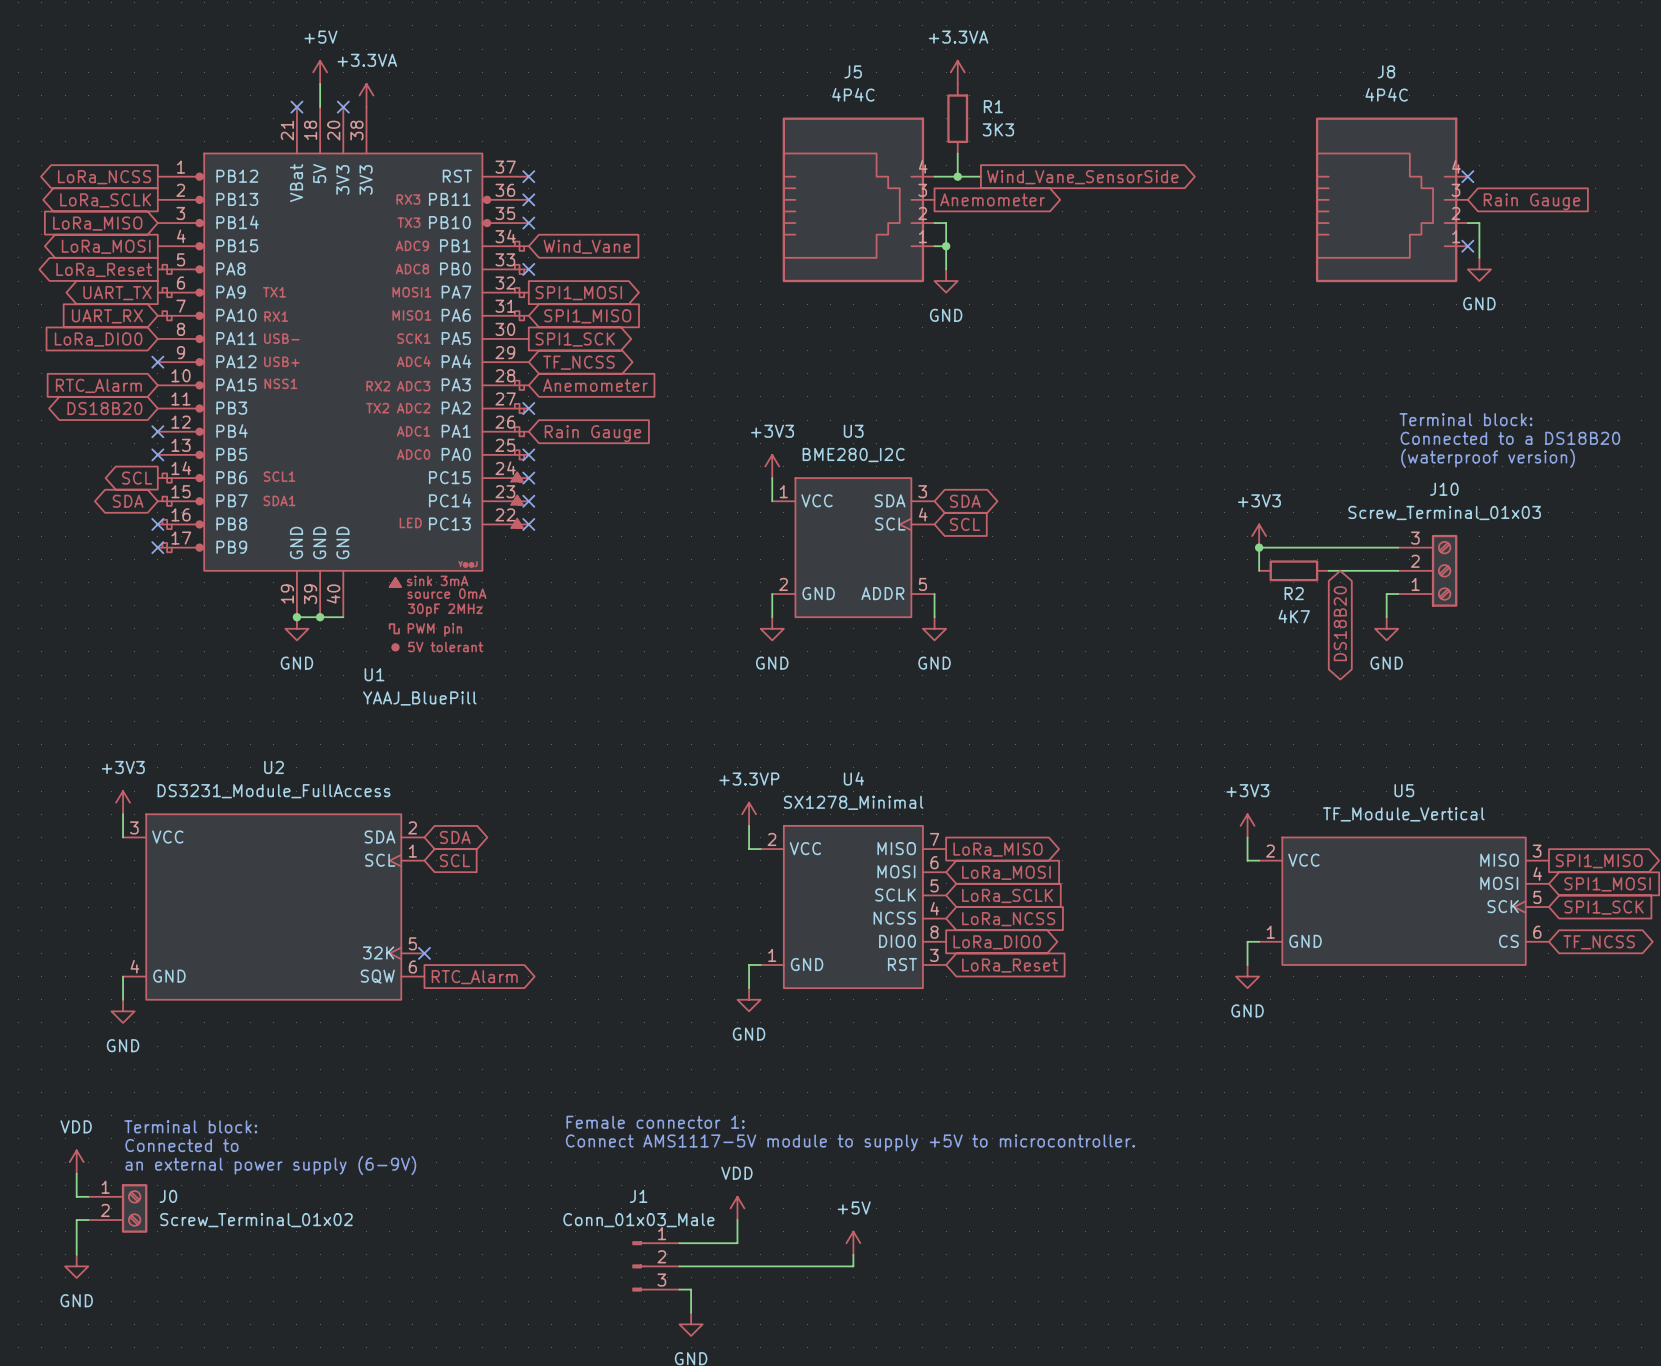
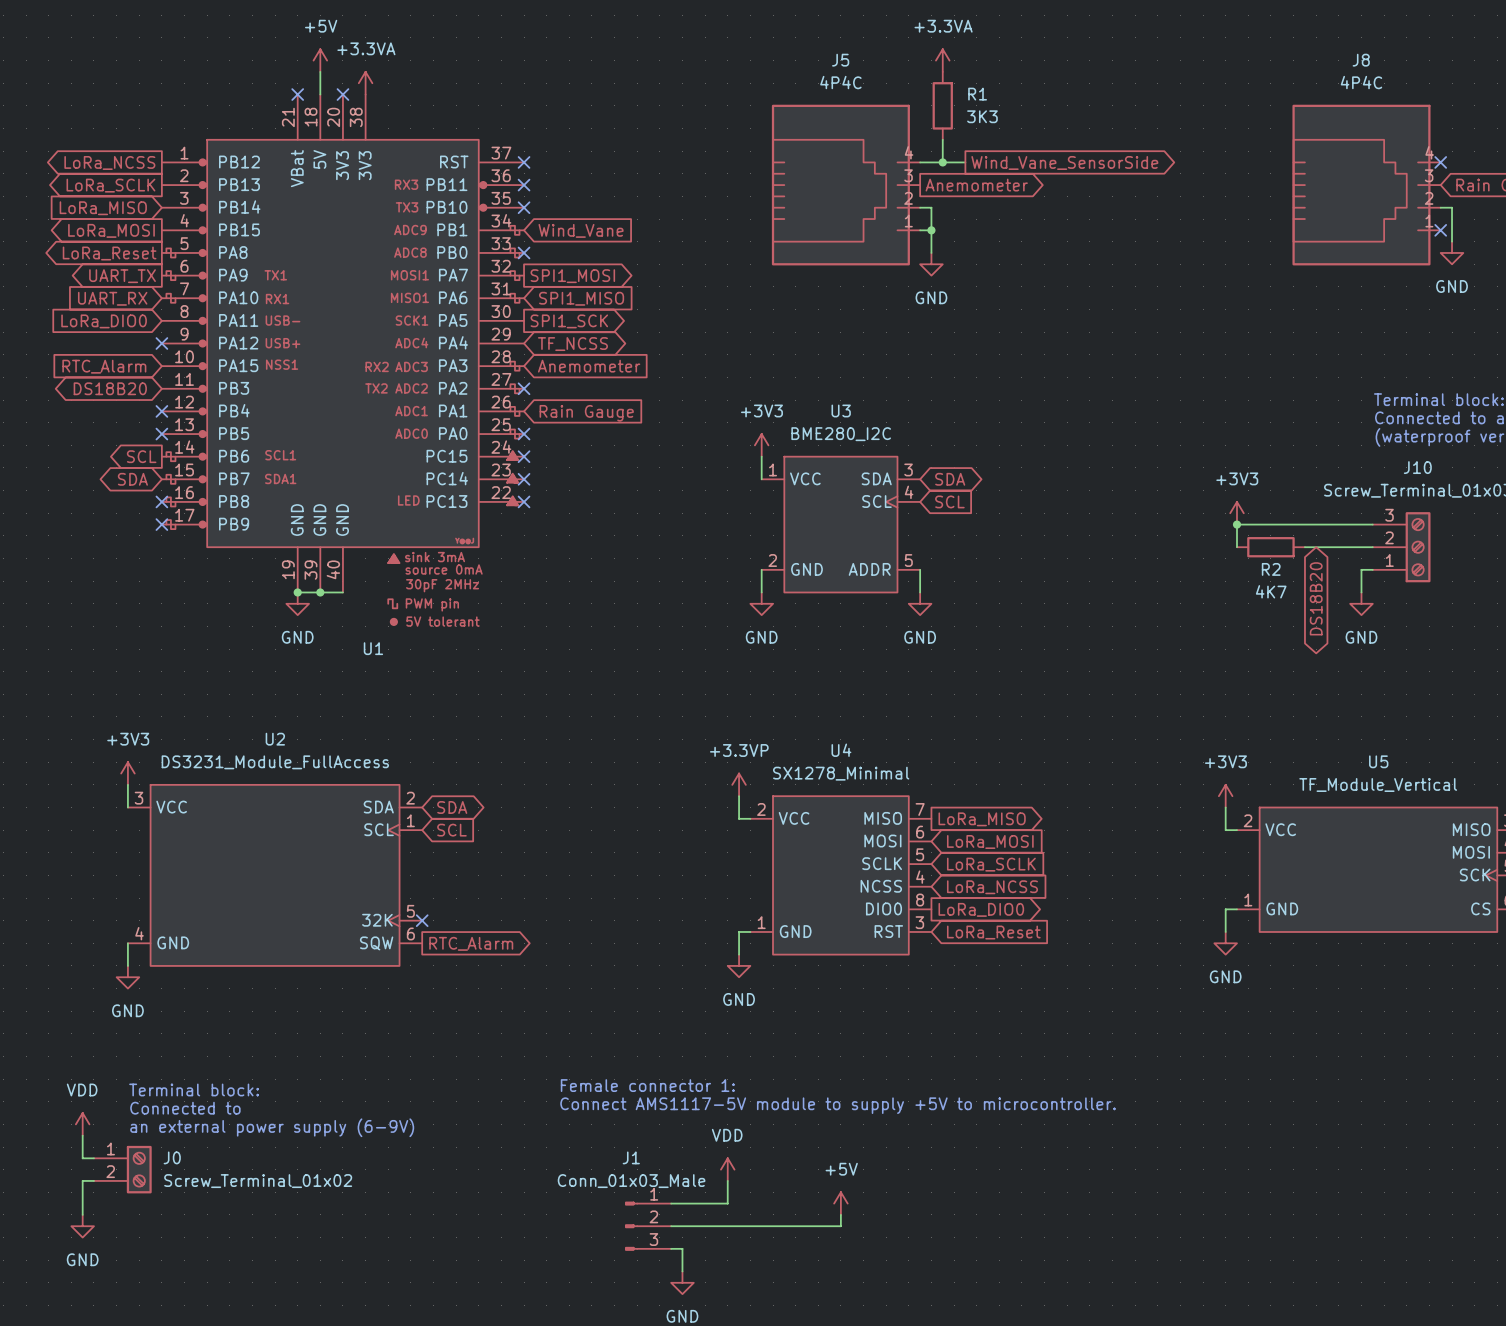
U1 value: YAAJ_BluePill (419, 698) -> none

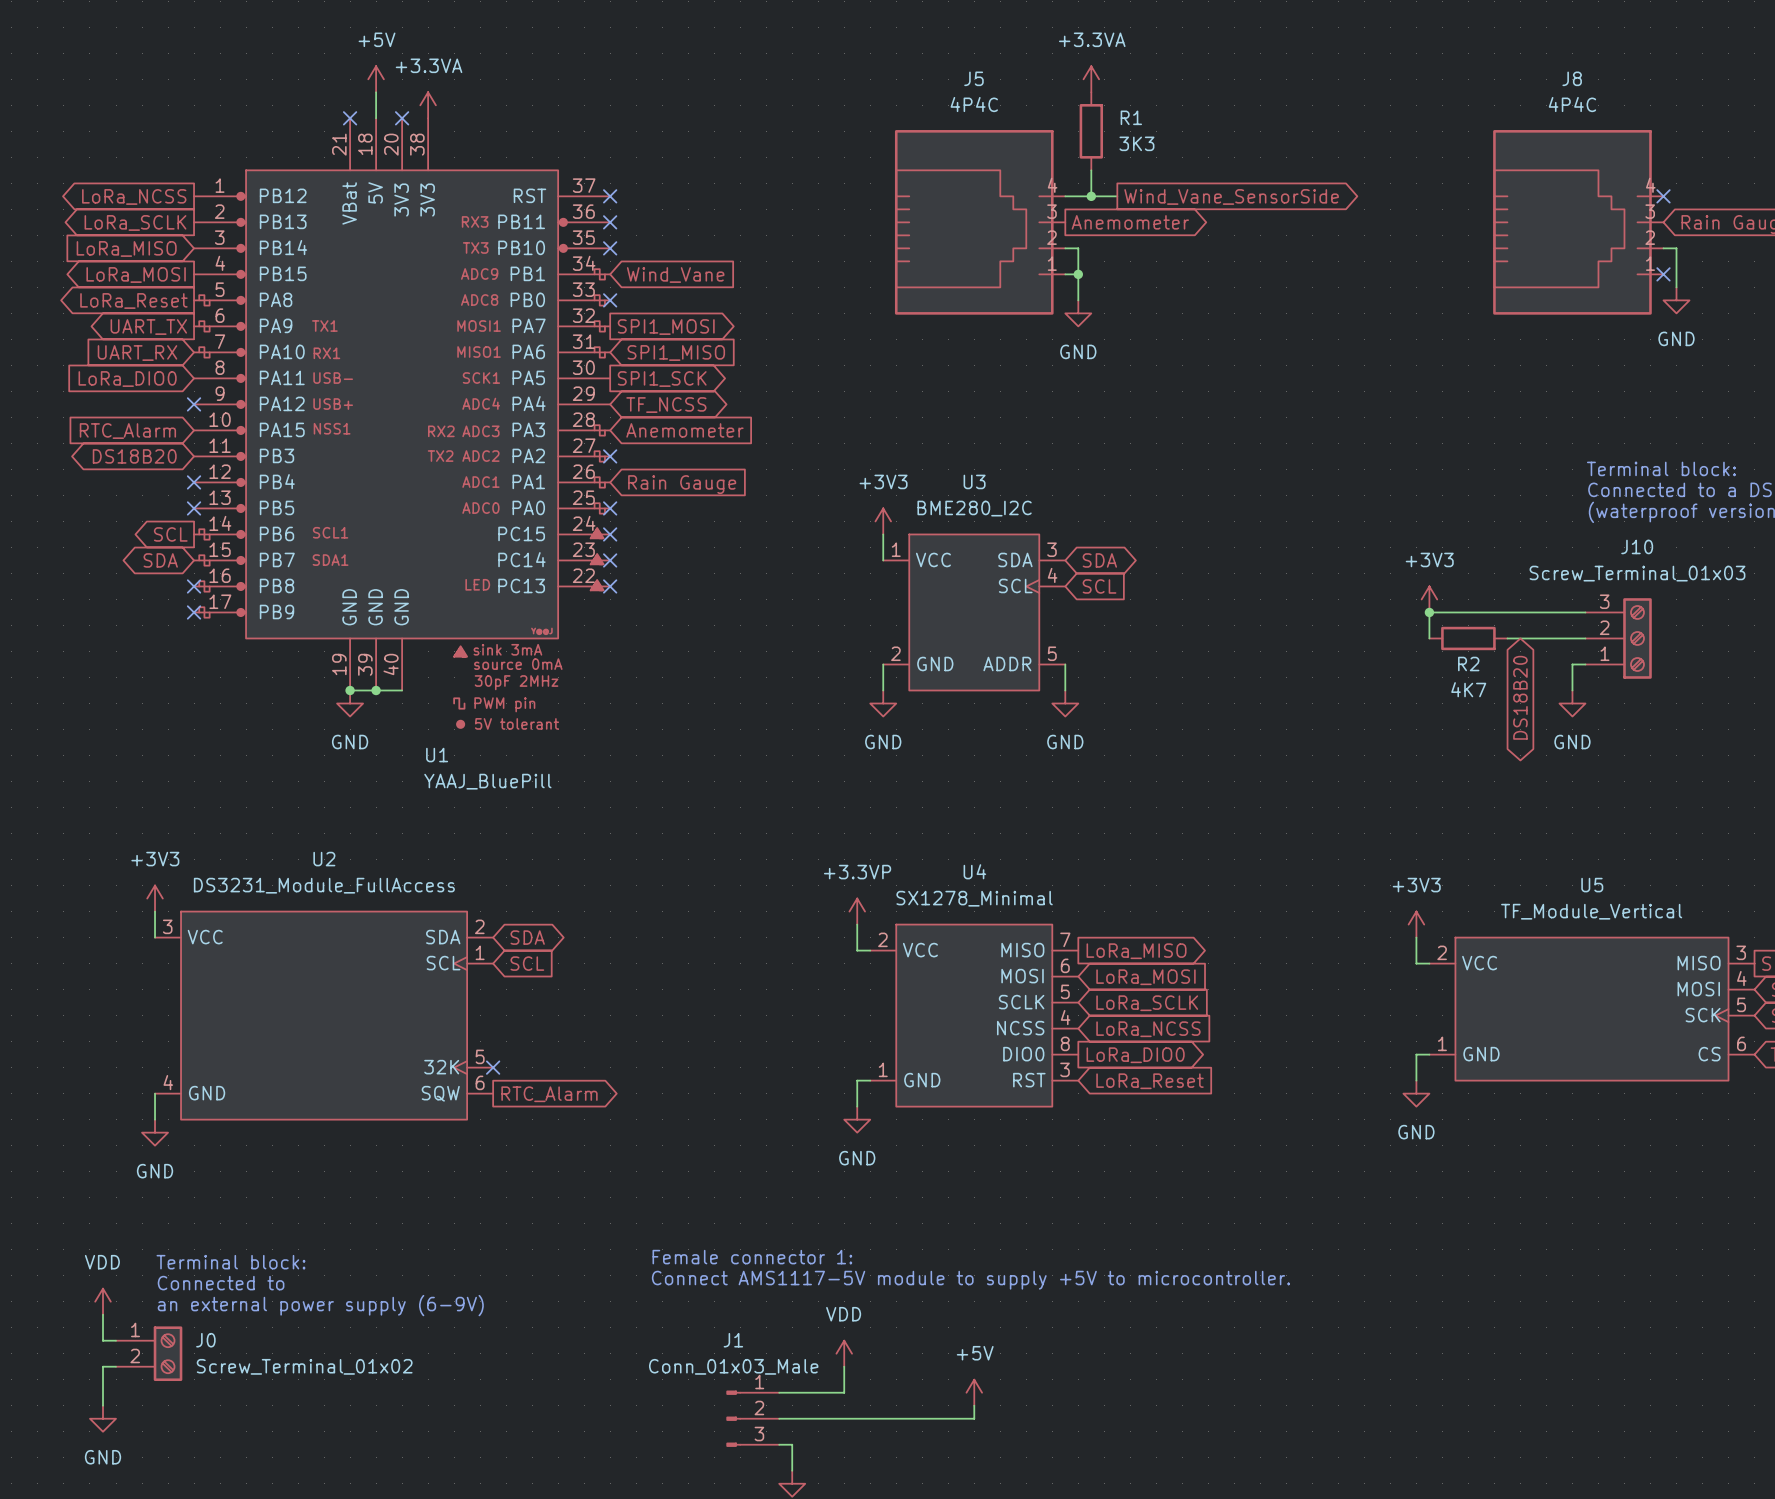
U1 value: none -> YAAJ_BluePill (487, 781)

